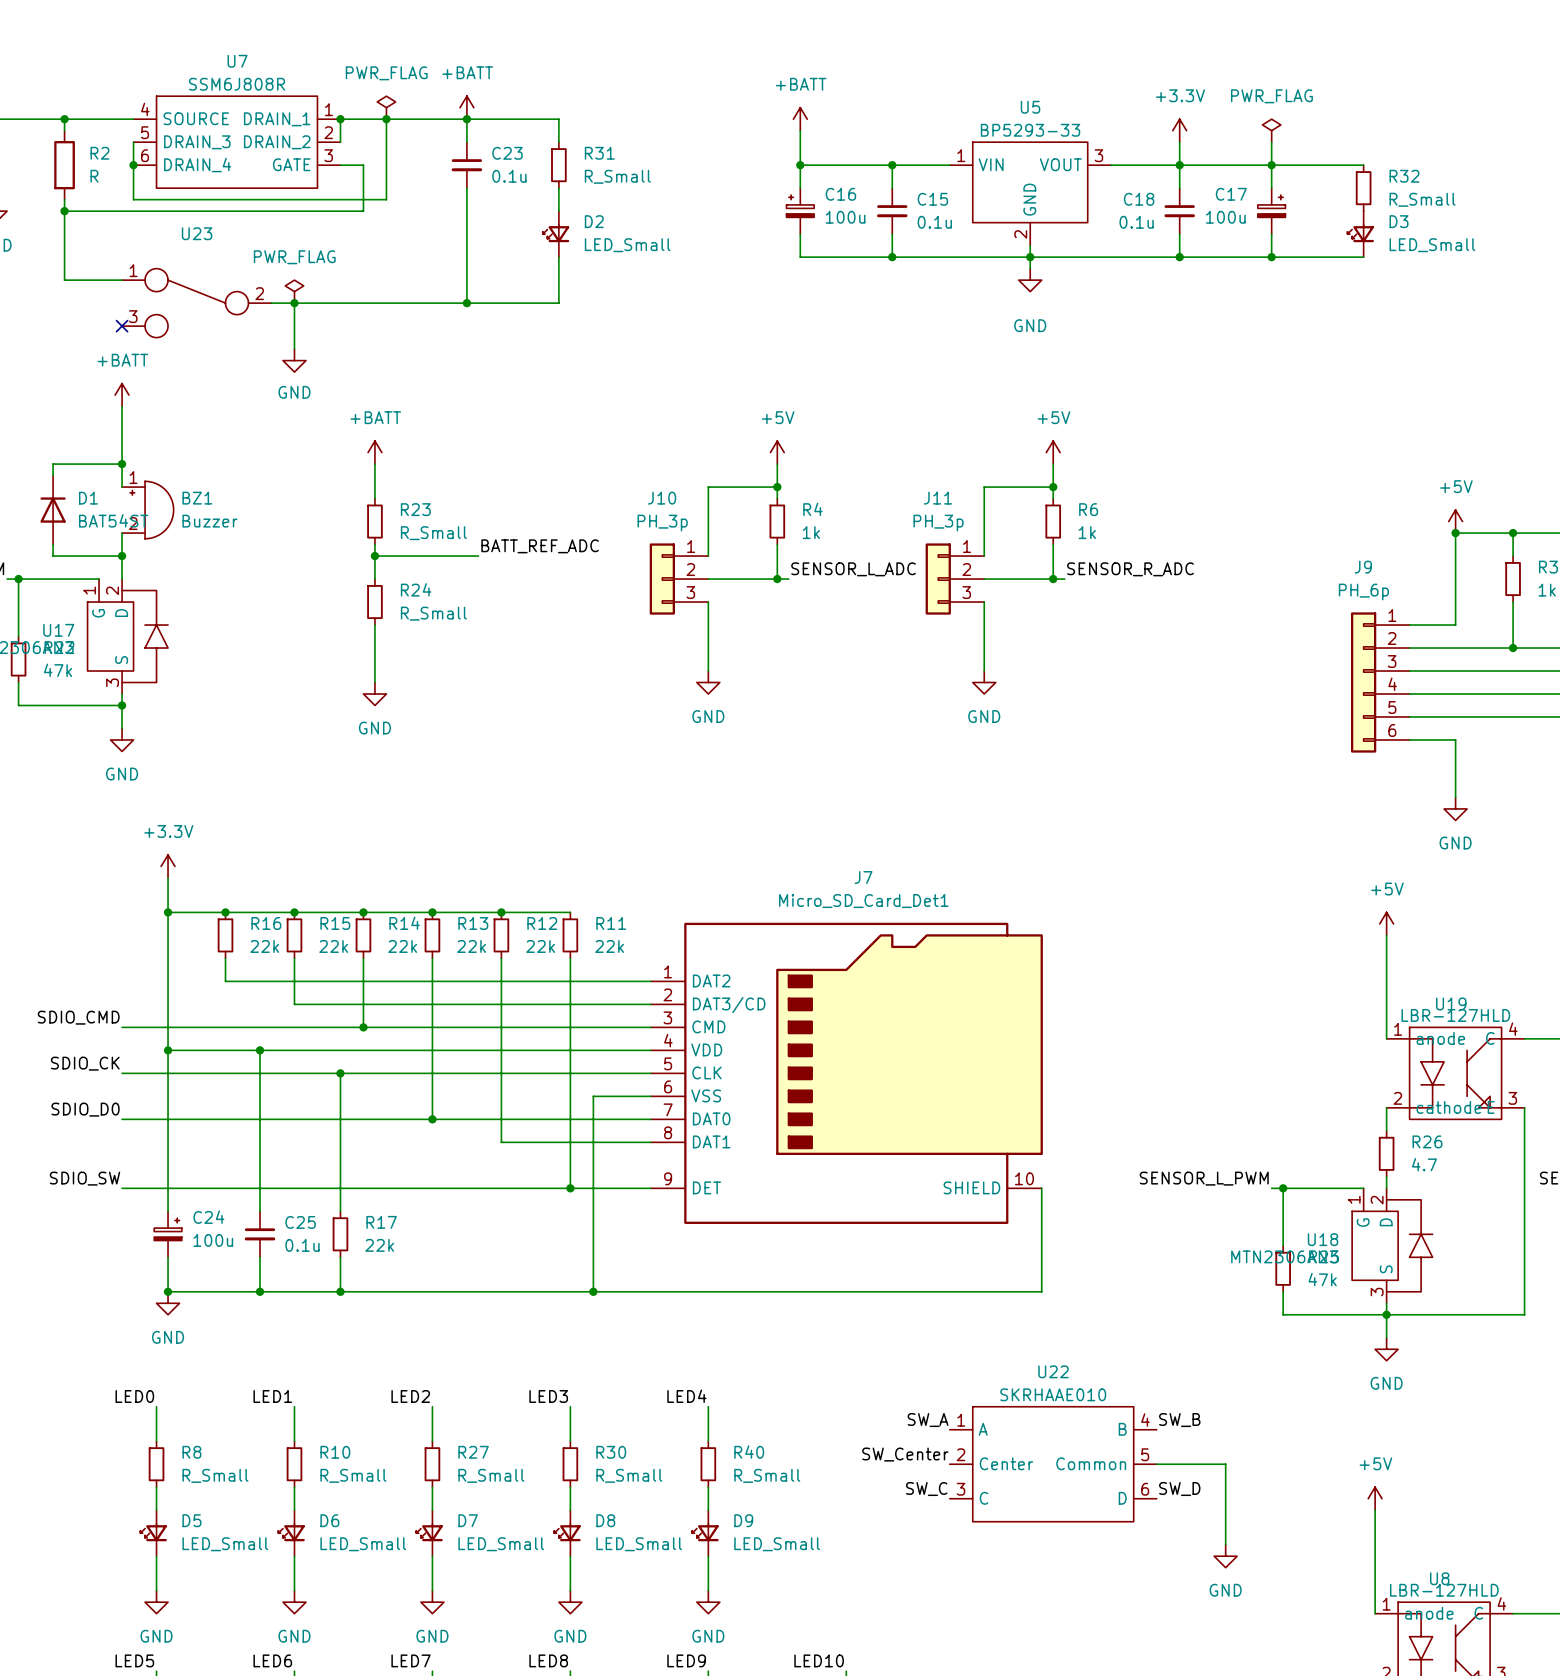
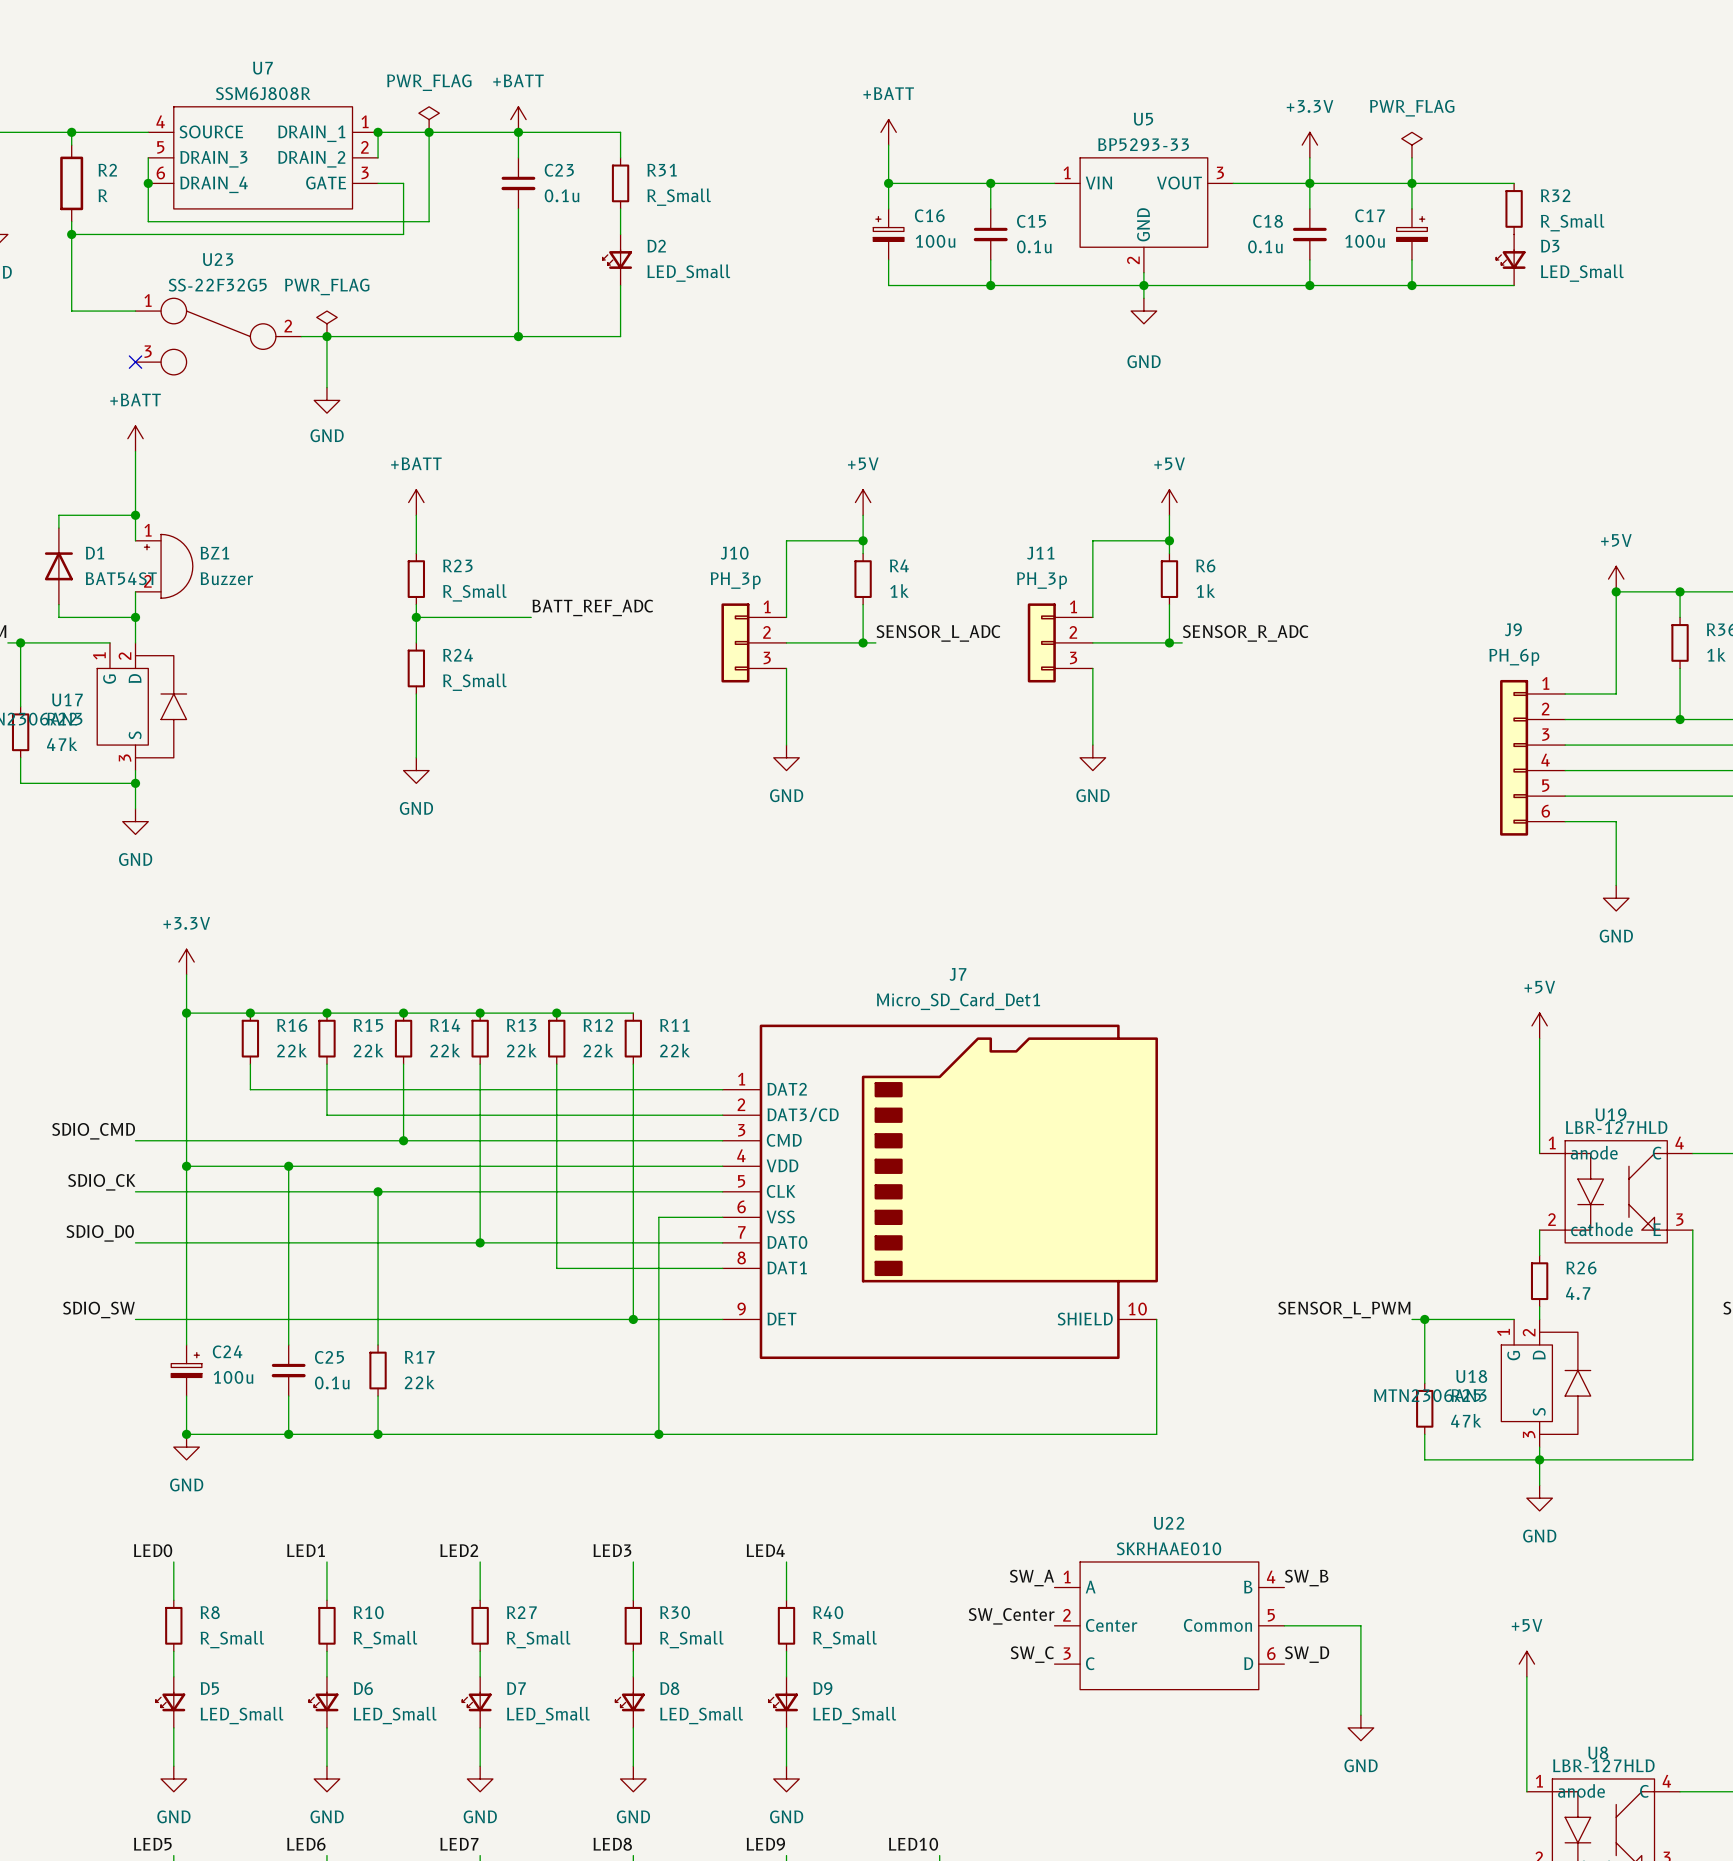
U23 value: none -> SS-22F32G5 (217, 285)

